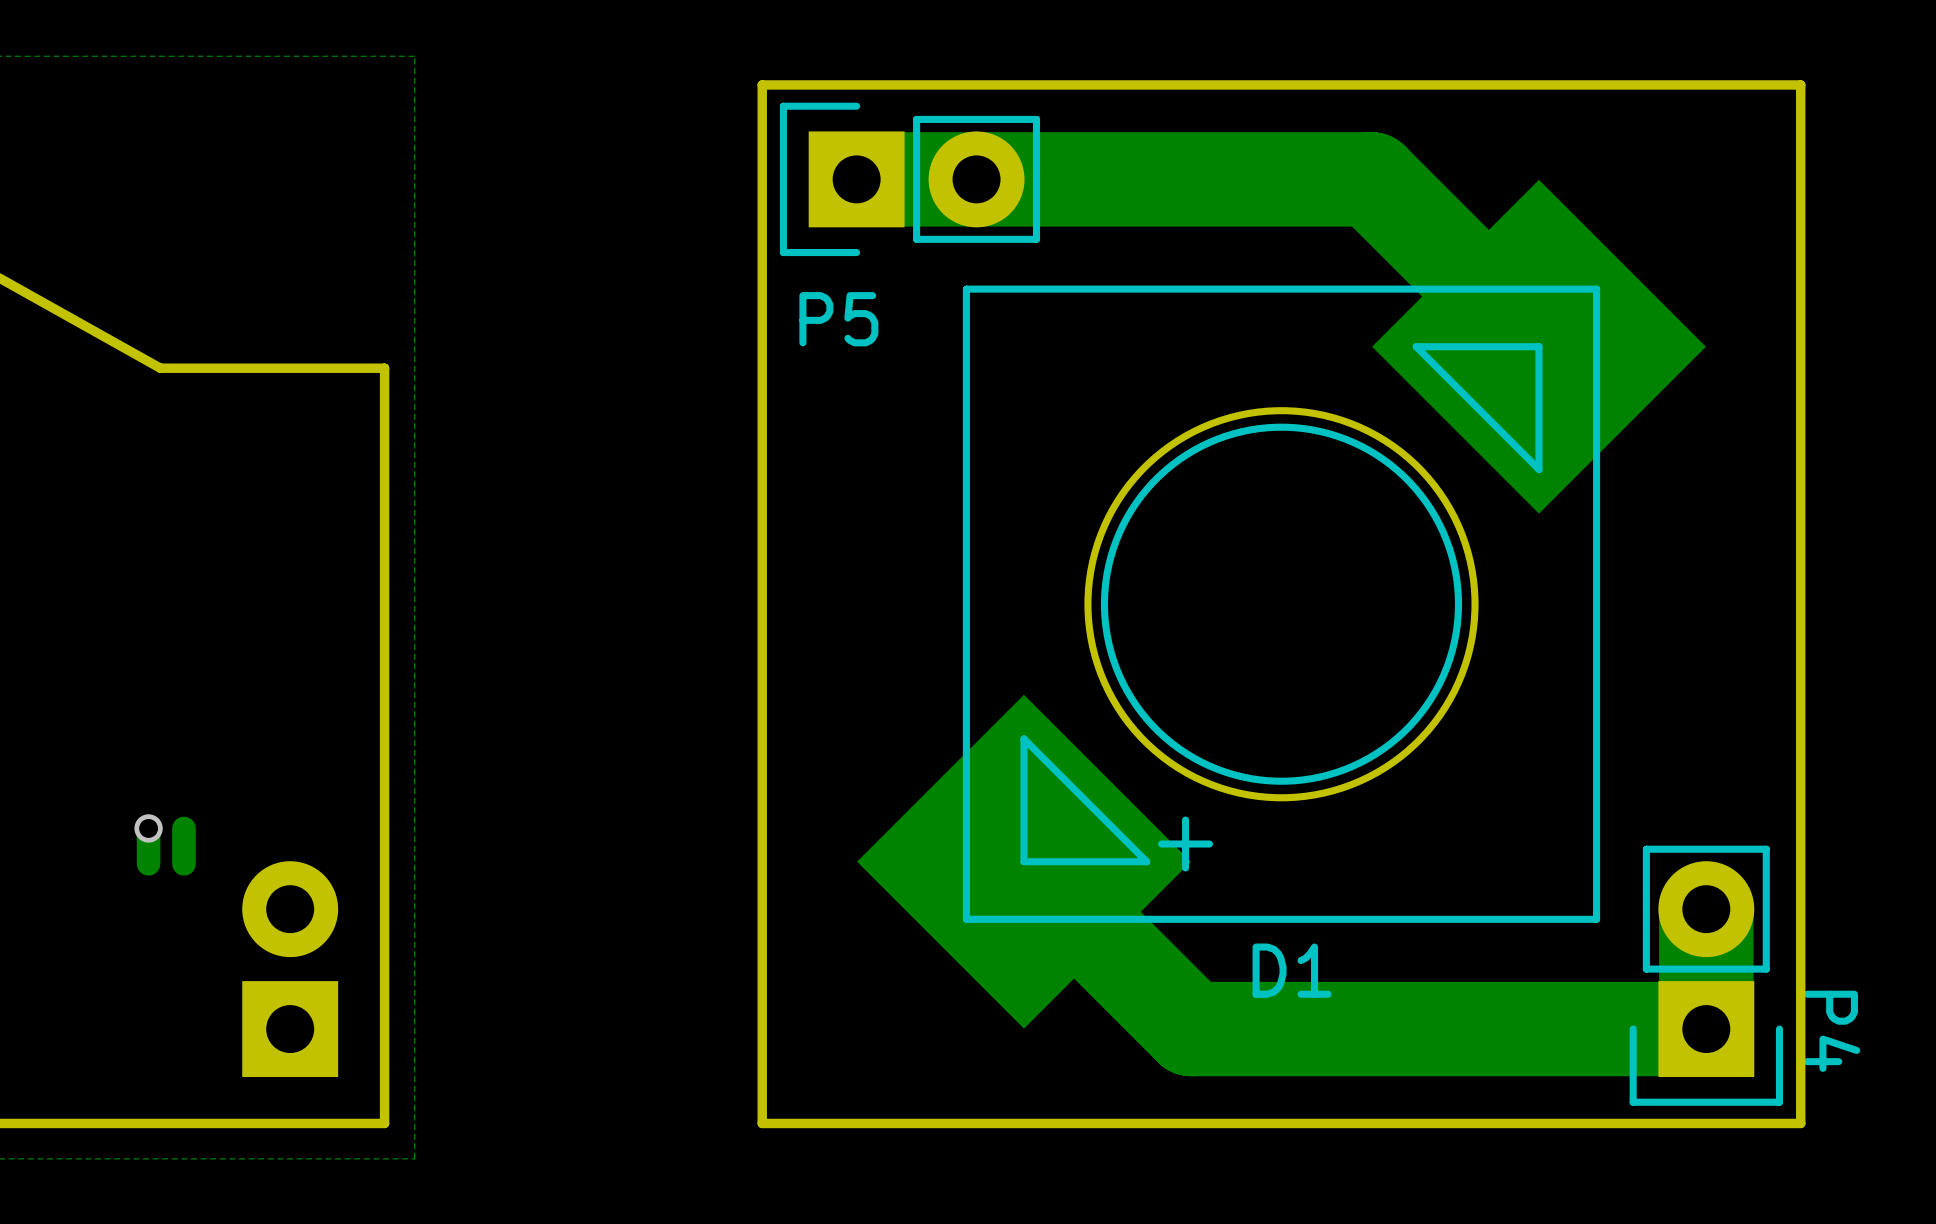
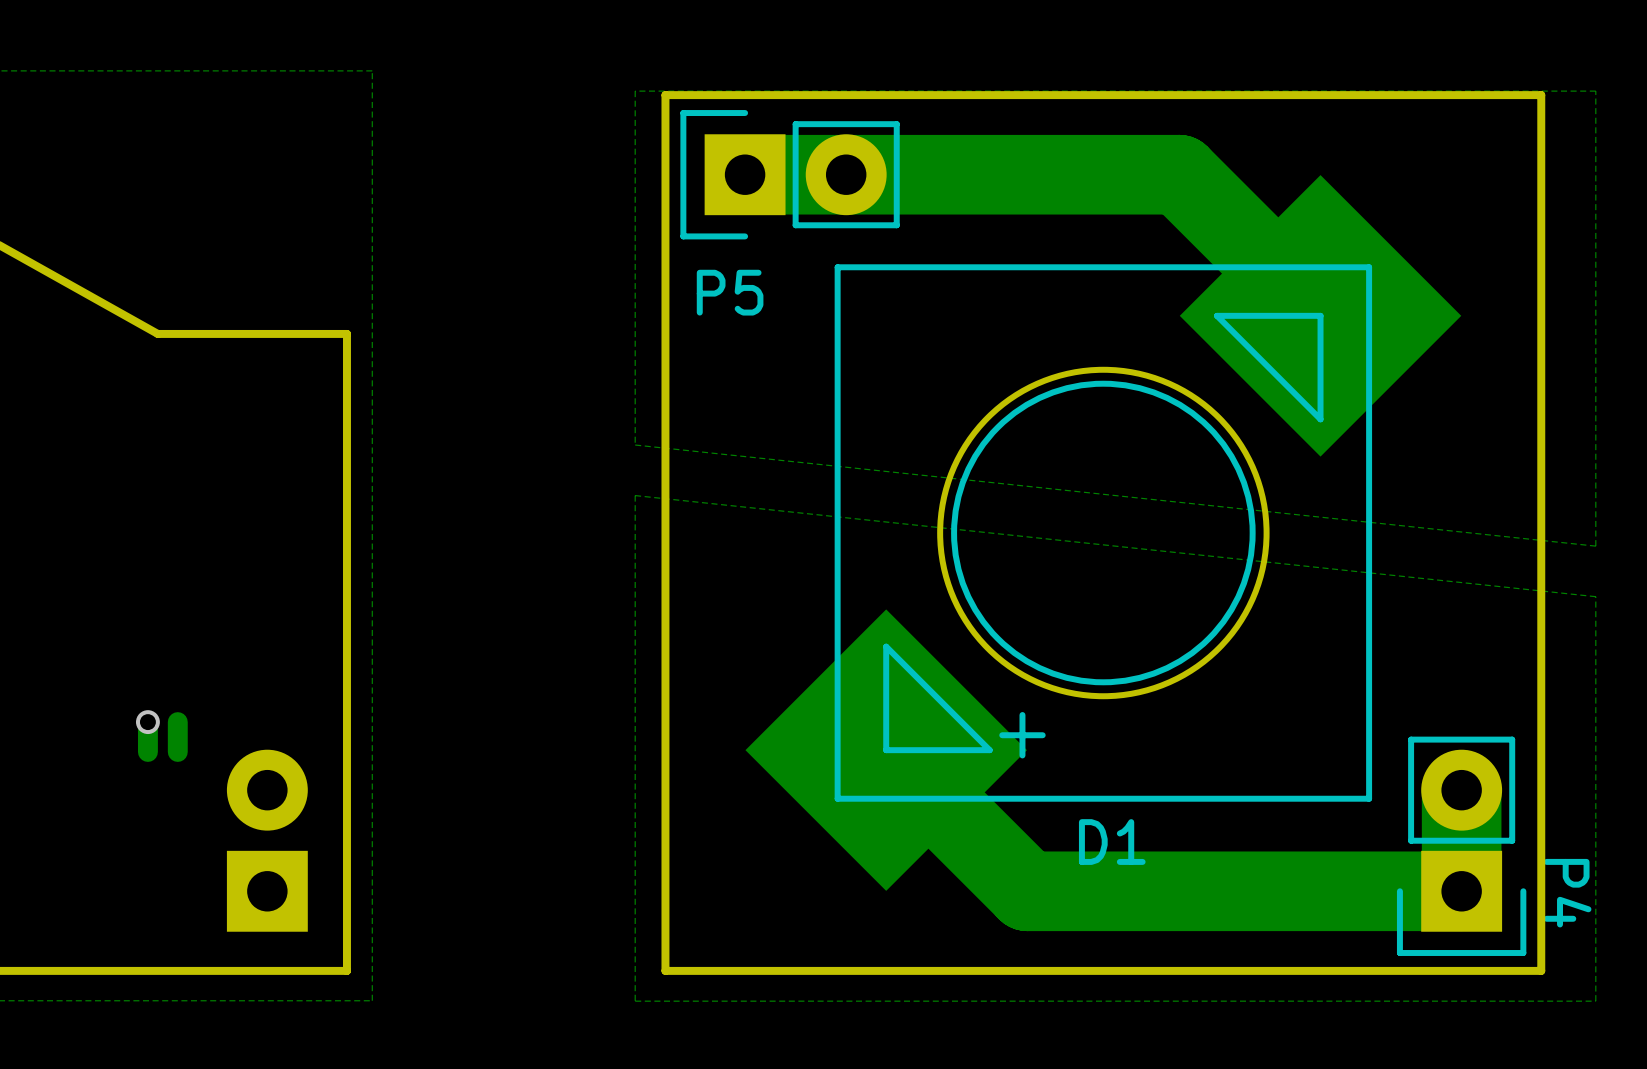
zone outline: none -> (1595, 91) (1595, 546) (635, 445) (635, 91) (1595, 91)
zone outline: none -> (635, 495) (1595, 596) (1595, 1001) (635, 1001) (635, 495)

